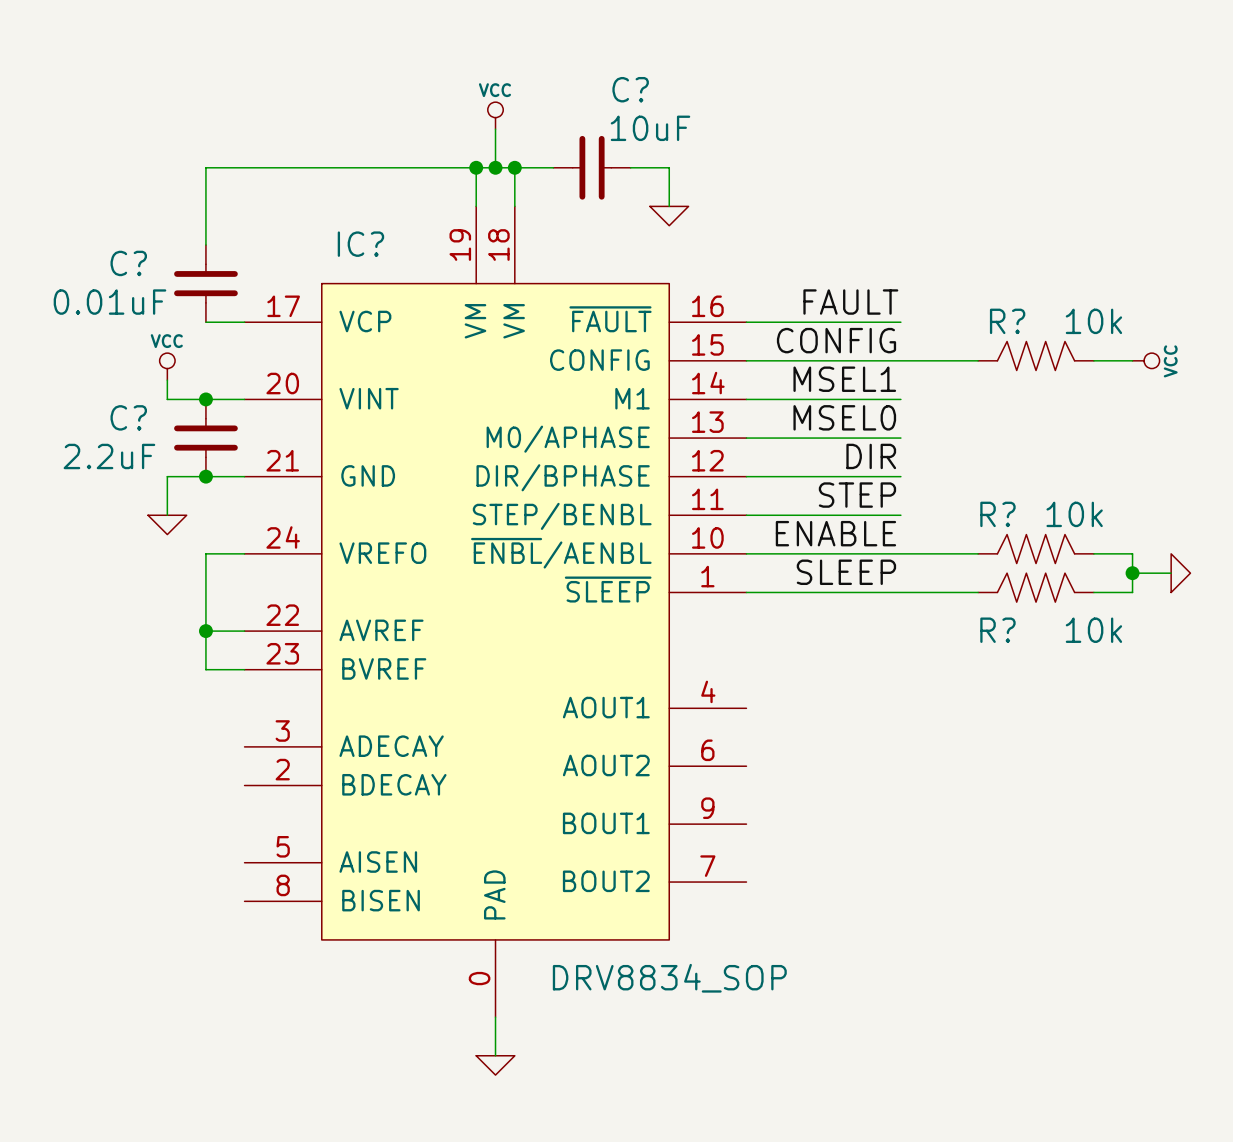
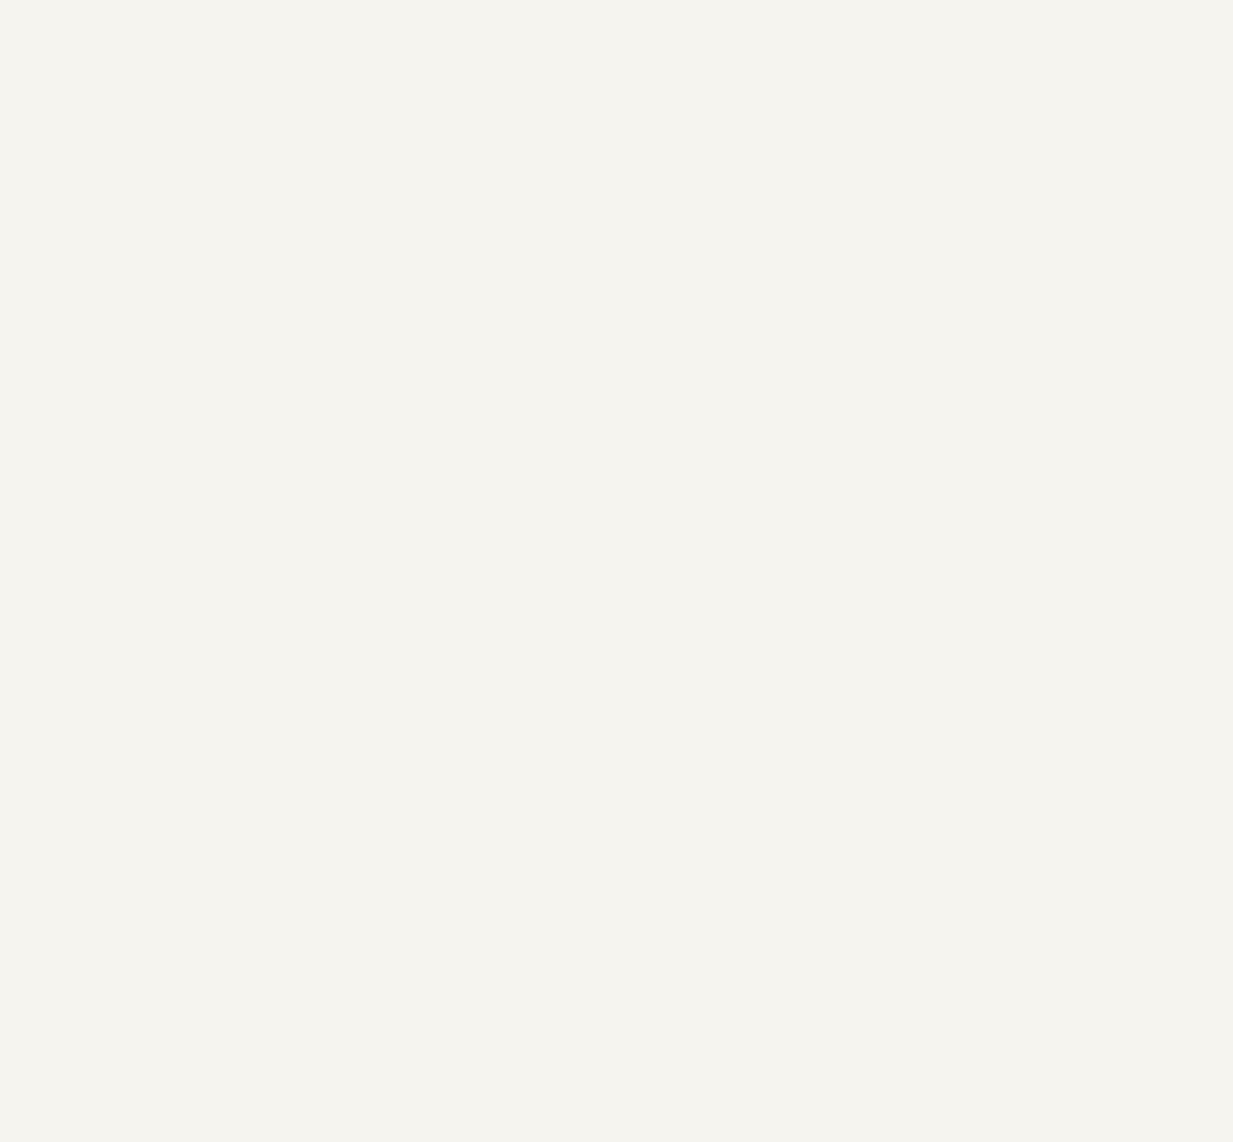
power symbol: VCC (495, 115) -> none
wire: (495, 129) (495, 167) -> none
wire: (476, 167) (476, 206) -> none
junction: (476, 167) -> none
junction: (495, 167) -> none
wire: (514, 167) (514, 206) -> none
junction: (514, 167) -> none
wire: (553, 167) (205, 167) (205, 245) -> none
C?: 10uF (592, 167) -> none
wire: (630, 167) (669, 167) (669, 206) -> none
power symbol: (669, 216) -> none
C?: 0.01uF (205, 283) -> none
label: FAULT (850, 302) -> none
wire: (205, 322) (244, 322) -> none
wire: (746, 322) (900, 322) -> none
label: CONFIG (836, 340) -> none
R?: 10k (1036, 356) -> none
wire: (746, 360) (978, 360) -> none
wire: (1093, 360) (1132, 360) -> none
power symbol: VCC (1146, 360) -> none
power symbol: VCC (167, 366) -> none
label: MSEL1 (844, 379) -> none
wire: (167, 380) (167, 399) (244, 399) -> none
junction: (205, 399) -> none
wire: (746, 399) (900, 399) -> none
label: MSEL0 (844, 417) -> none
C?: 2.2uF (205, 438) -> none
wire: (746, 438) (900, 438) -> none
label: DIR (871, 456) -> none
junction: (205, 476) -> none
wire: (244, 476) (167, 476) (167, 515) -> none
wire: (746, 476) (900, 476) -> none
label: STEP (857, 495) -> none
wire: (746, 515) (900, 515) -> none
power symbol: (167, 524) -> none
label: ENABLE (835, 533) -> none
R?: 10k (1036, 549) -> none
wire: (244, 553) (205, 553) (205, 669) (244, 669) -> none
wire: (746, 553) (978, 553) -> none
wire: (1093, 553) (1132, 553) (1132, 592) (1093, 592) -> none
label: SLEEP (846, 572) -> none
wire: (1132, 573) (1171, 573) -> none
junction: (1132, 573) -> none
power symbol: (1180, 573) -> none
R?: 10k (1036, 587) -> none
wire: (746, 592) (978, 592) -> none
IC?: DRV8834_SOP (495, 611) -> none
wire: (205, 631) (244, 631) -> none
junction: (205, 631) -> none
wire: (495, 1017) (495, 1055) -> none
power symbol: (495, 1065) -> none

